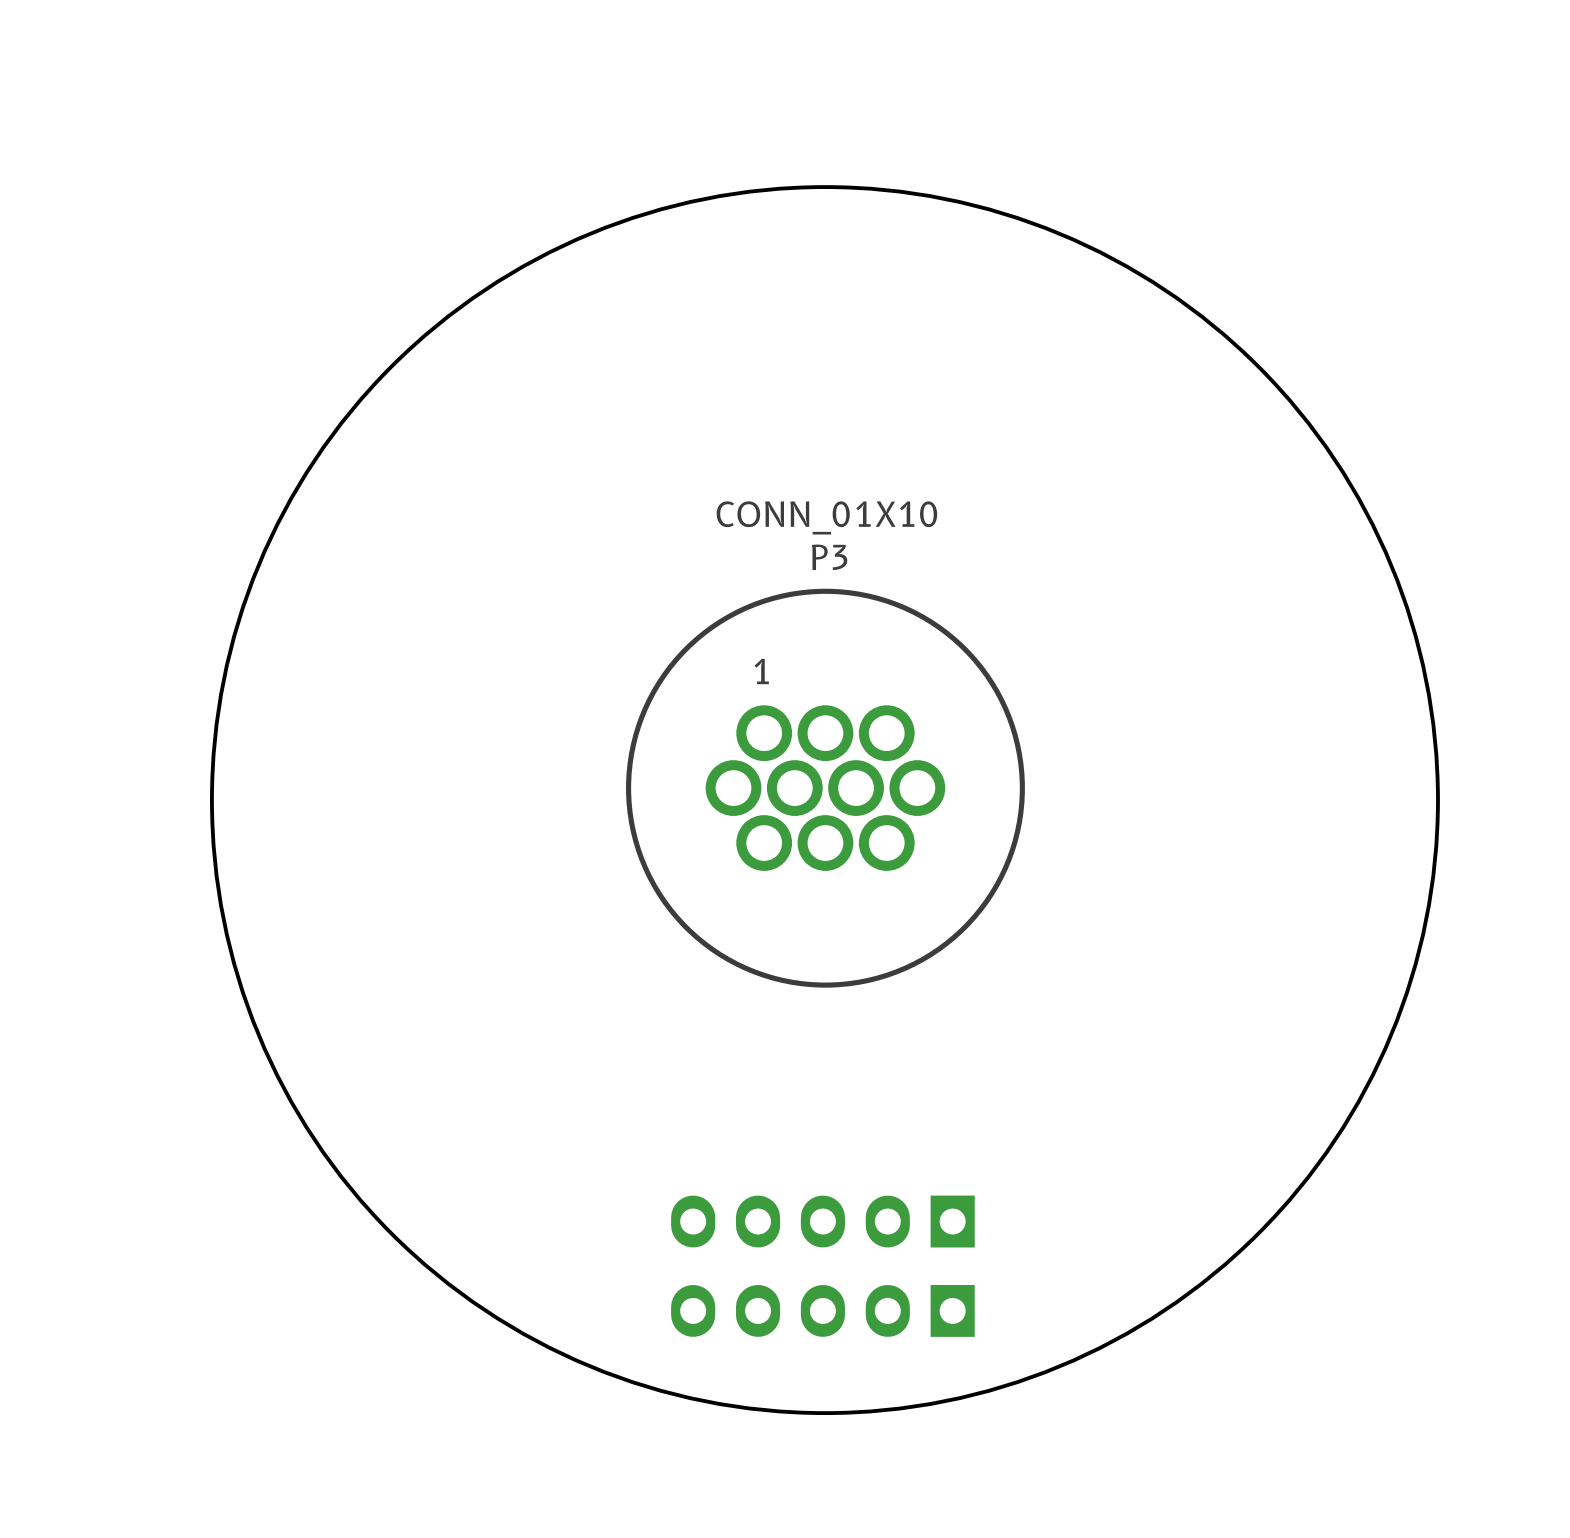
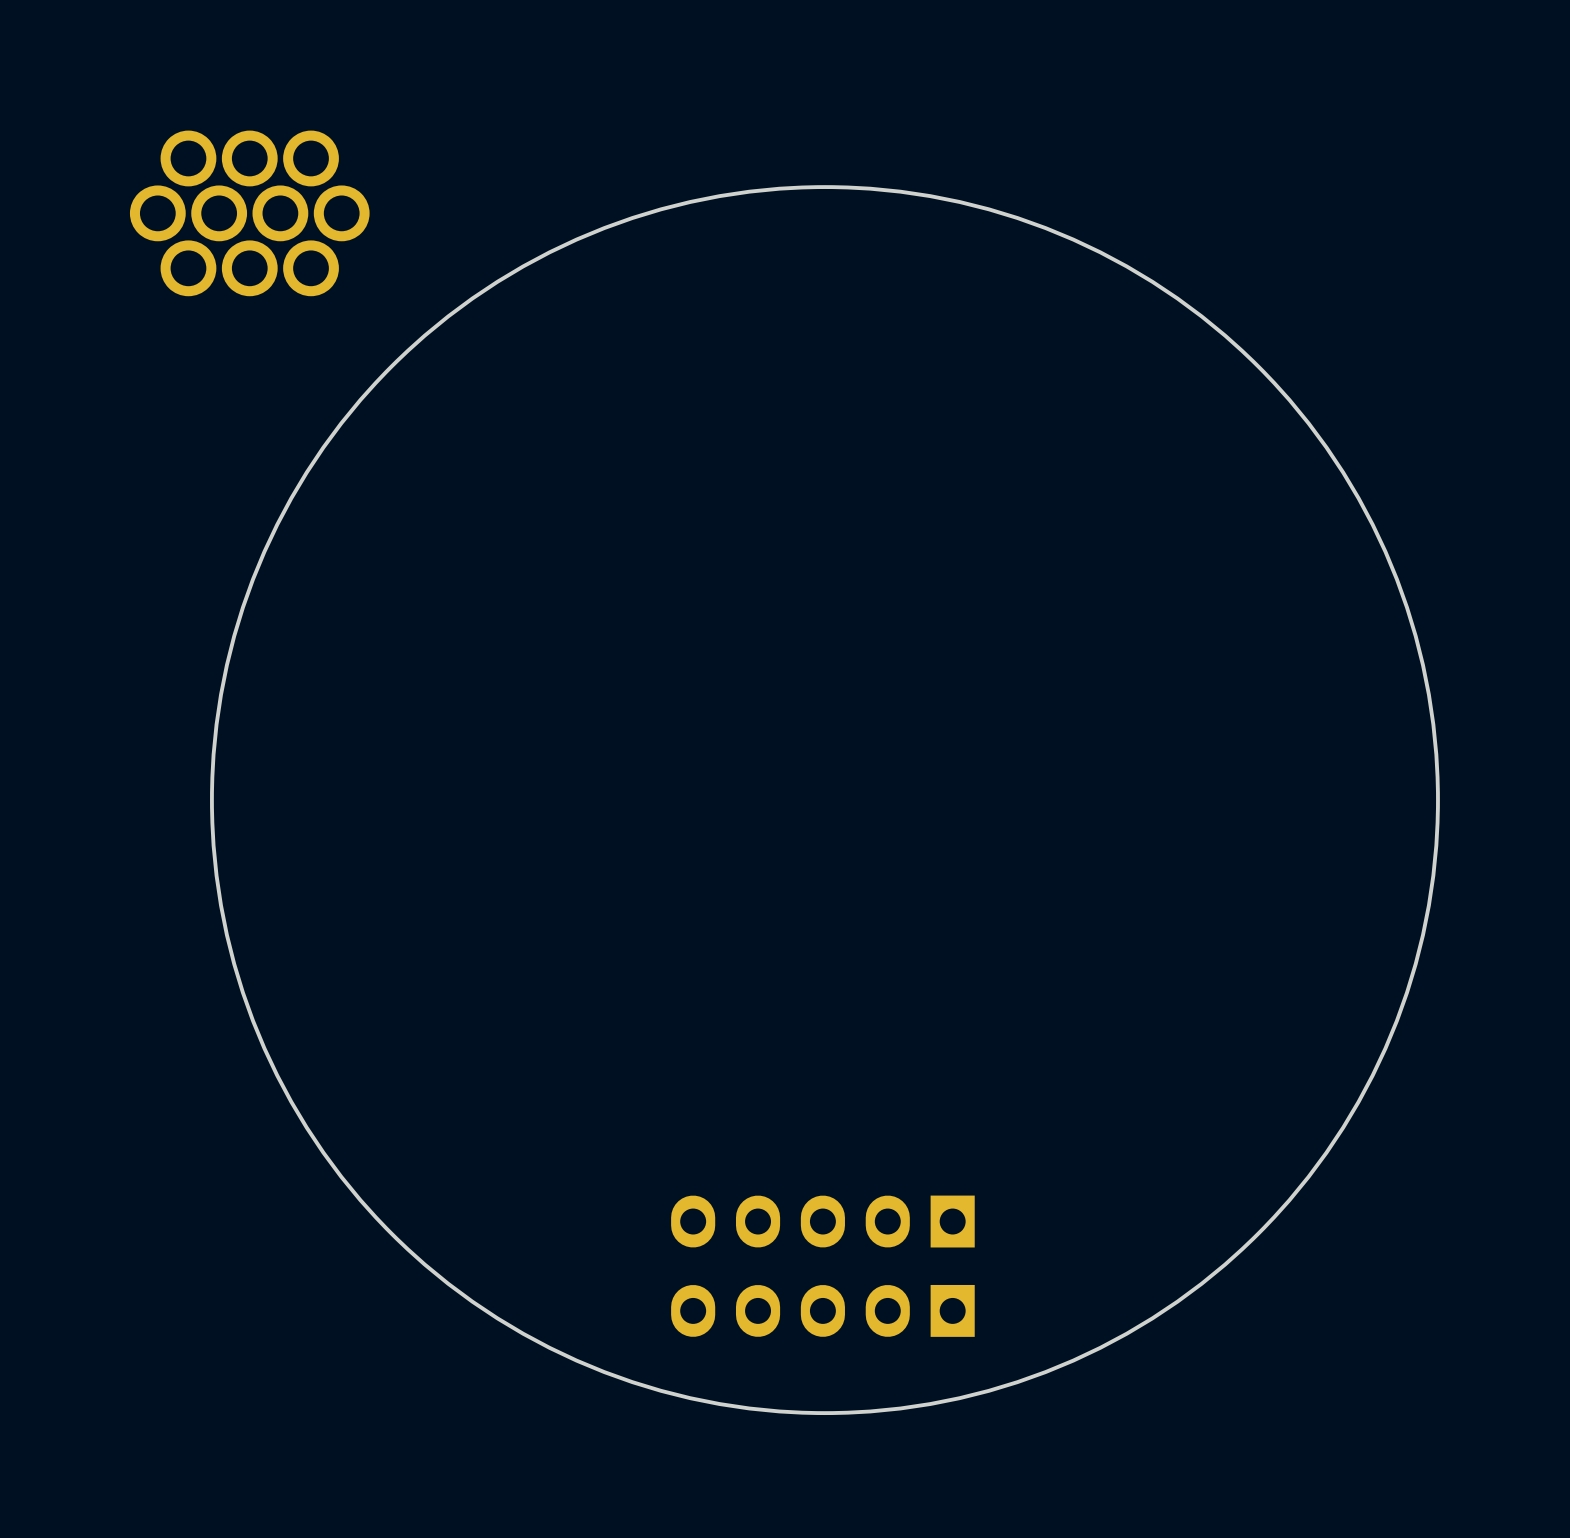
part: none -> (249, 213)
P3: CONN_01X10 (825, 788) -> none

